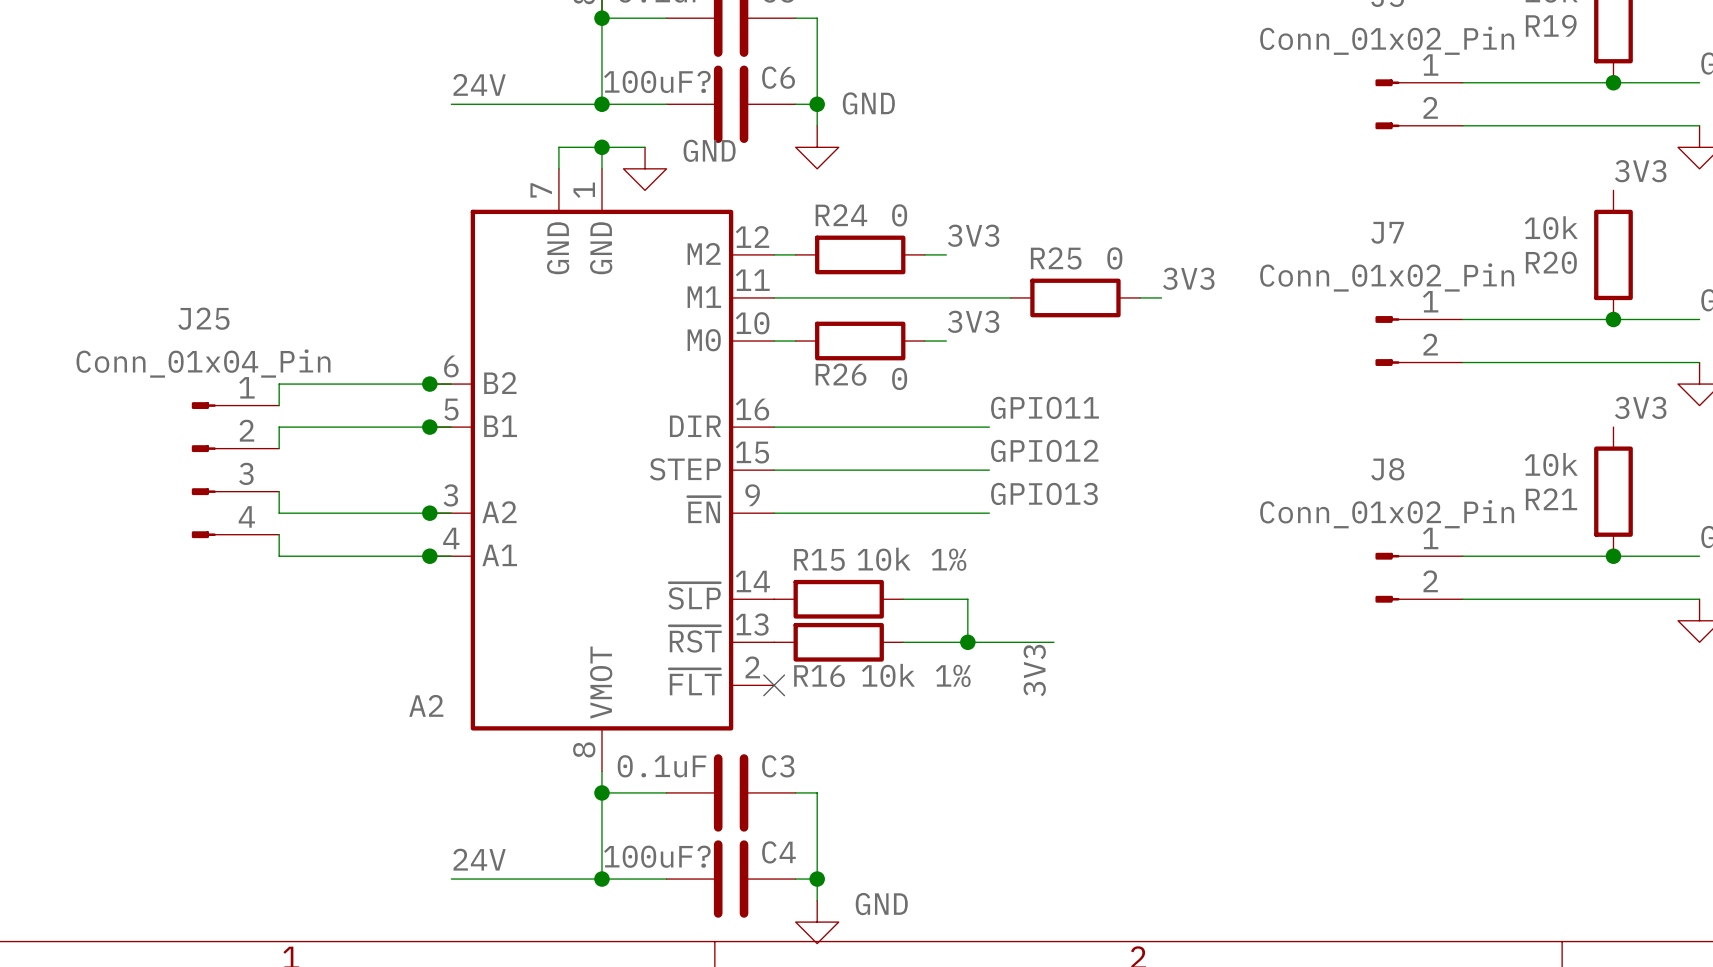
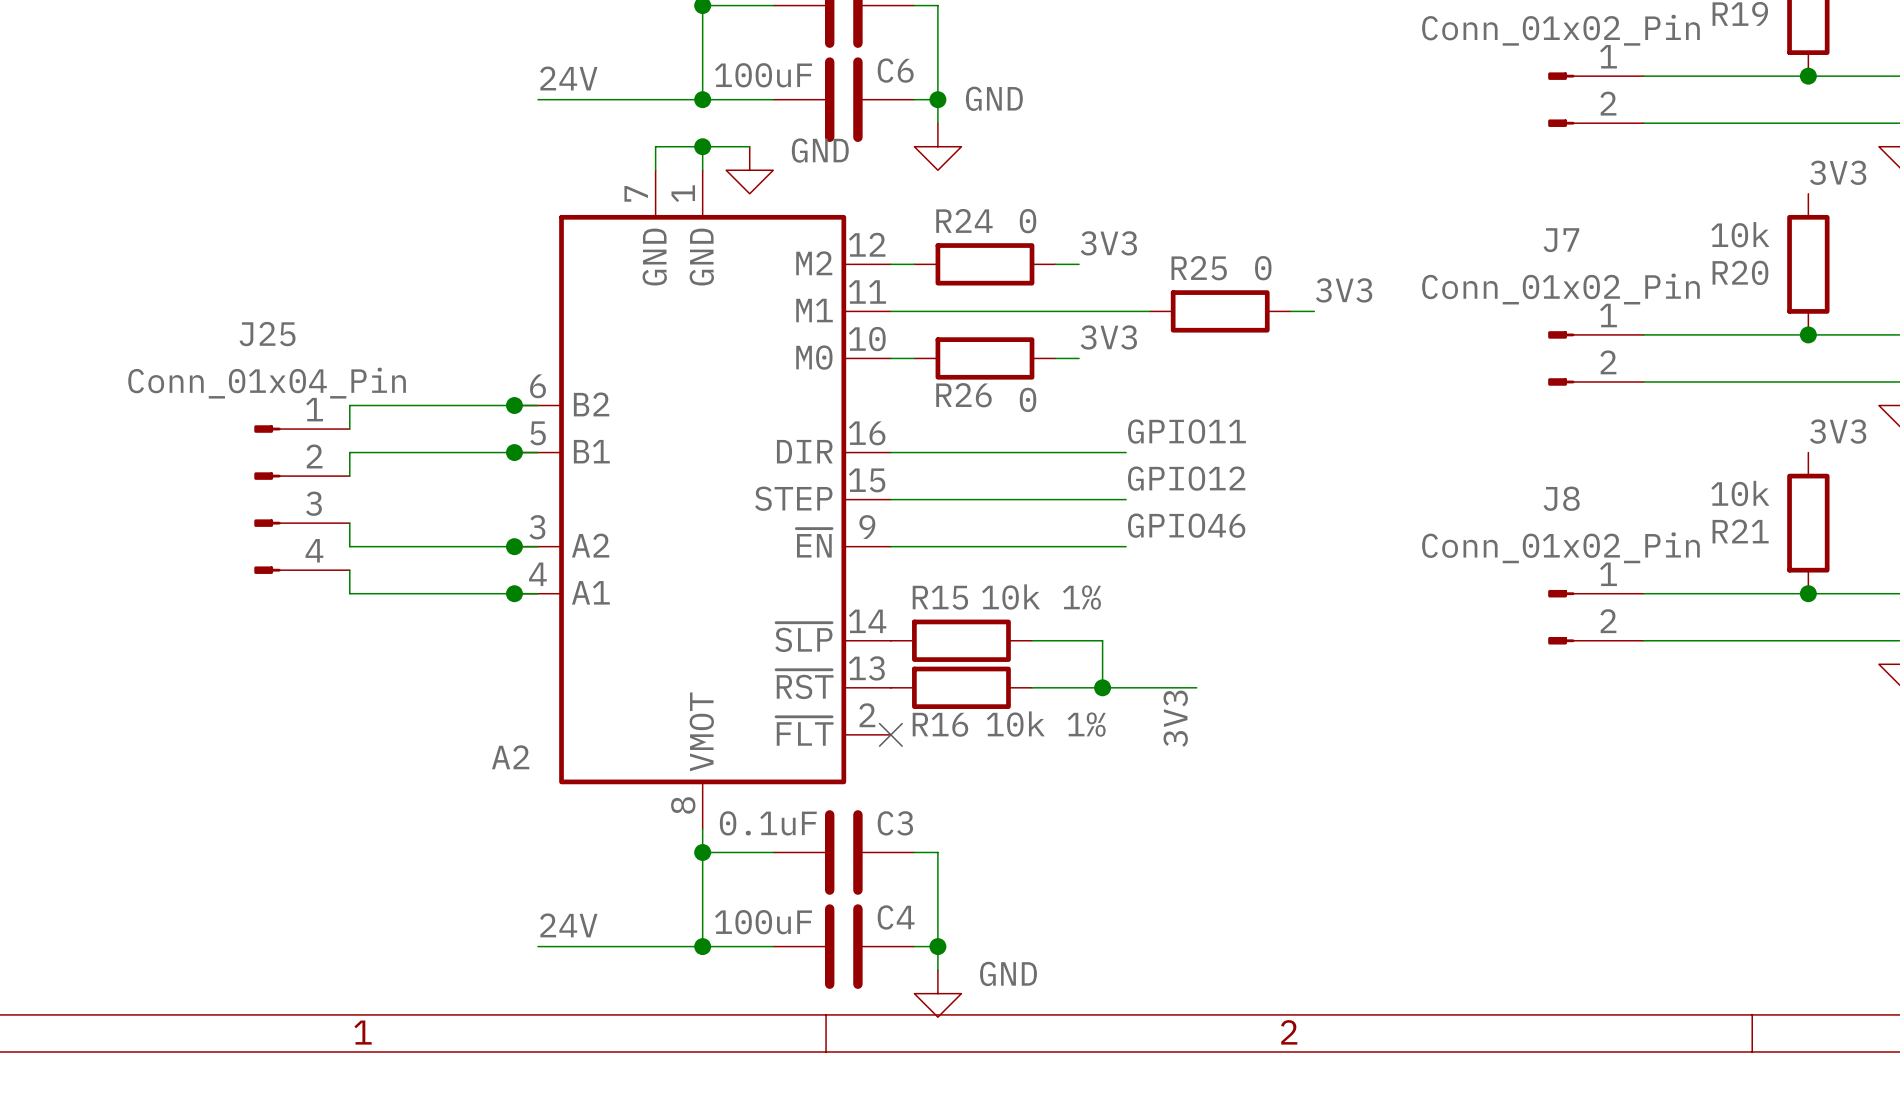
C6 value: 100uF? (657, 81) -> 100uF (763, 75)
label: GPIO13 (1044, 493) -> GPIO46 (1186, 525)
C4 value: 100uF? (657, 856) -> 100uF (763, 922)

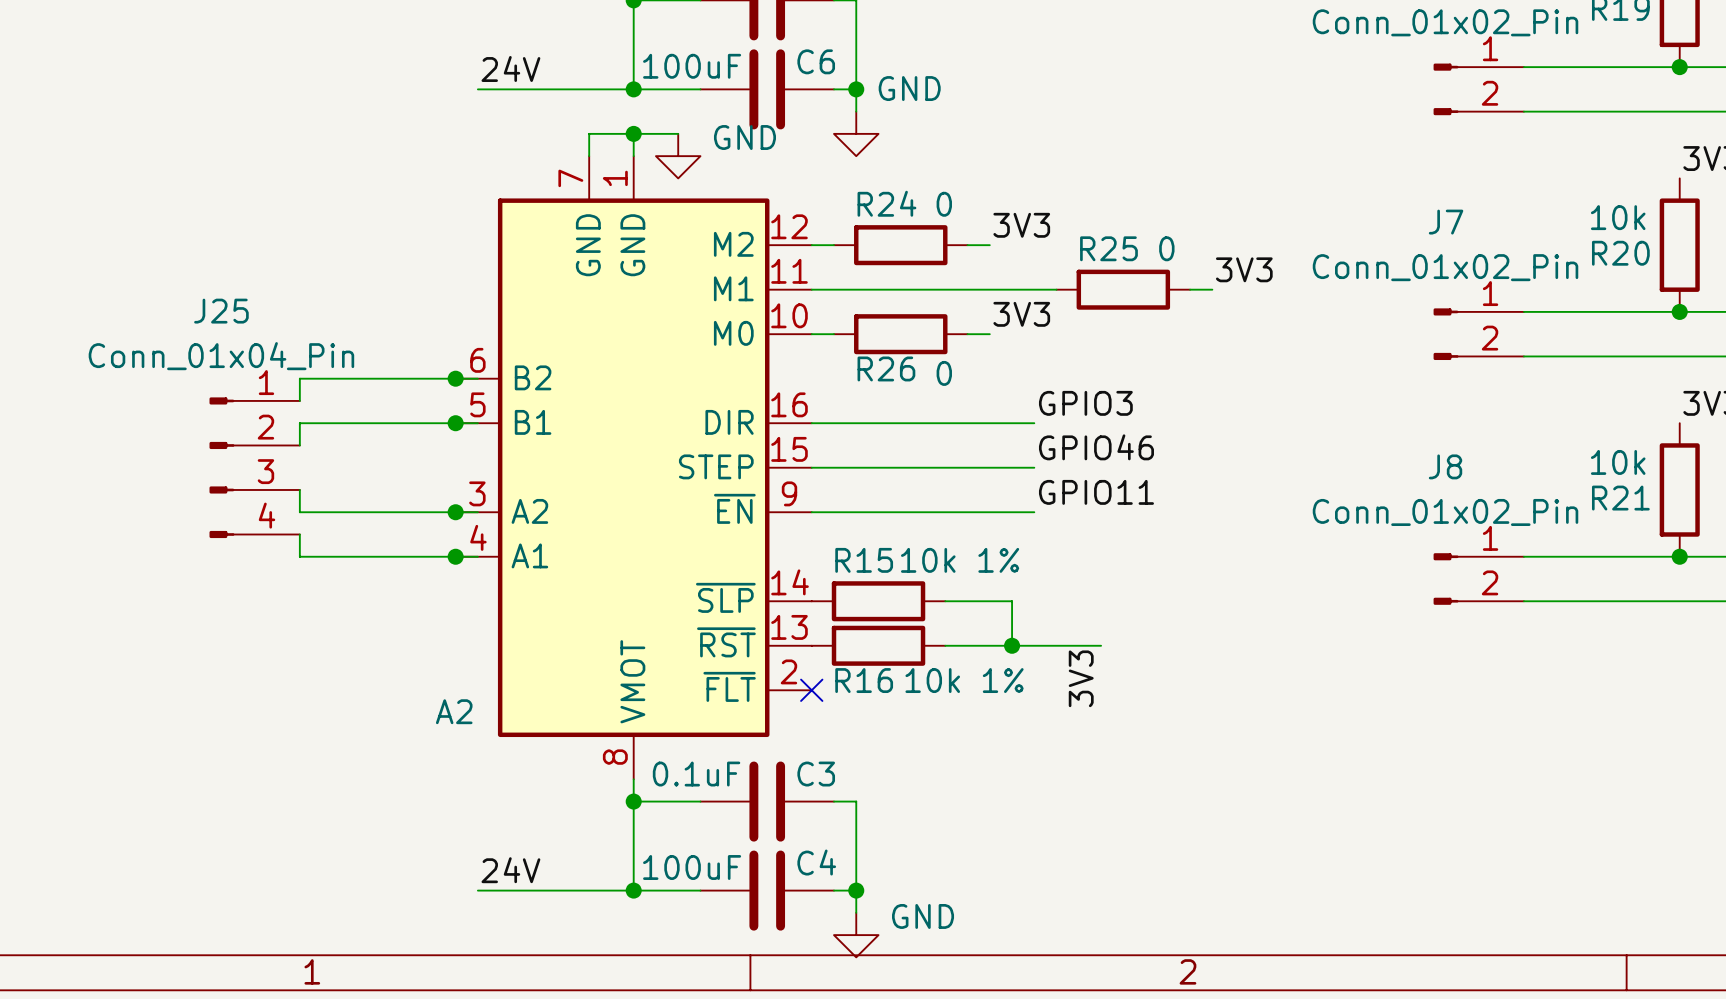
label: GPIO11 (1186, 431) -> GPIO3 (1085, 403)
label: GPIO12 (1186, 478) -> GPIO46 (1096, 447)
label: GPIO46 (1186, 525) -> GPIO11 (1096, 492)

